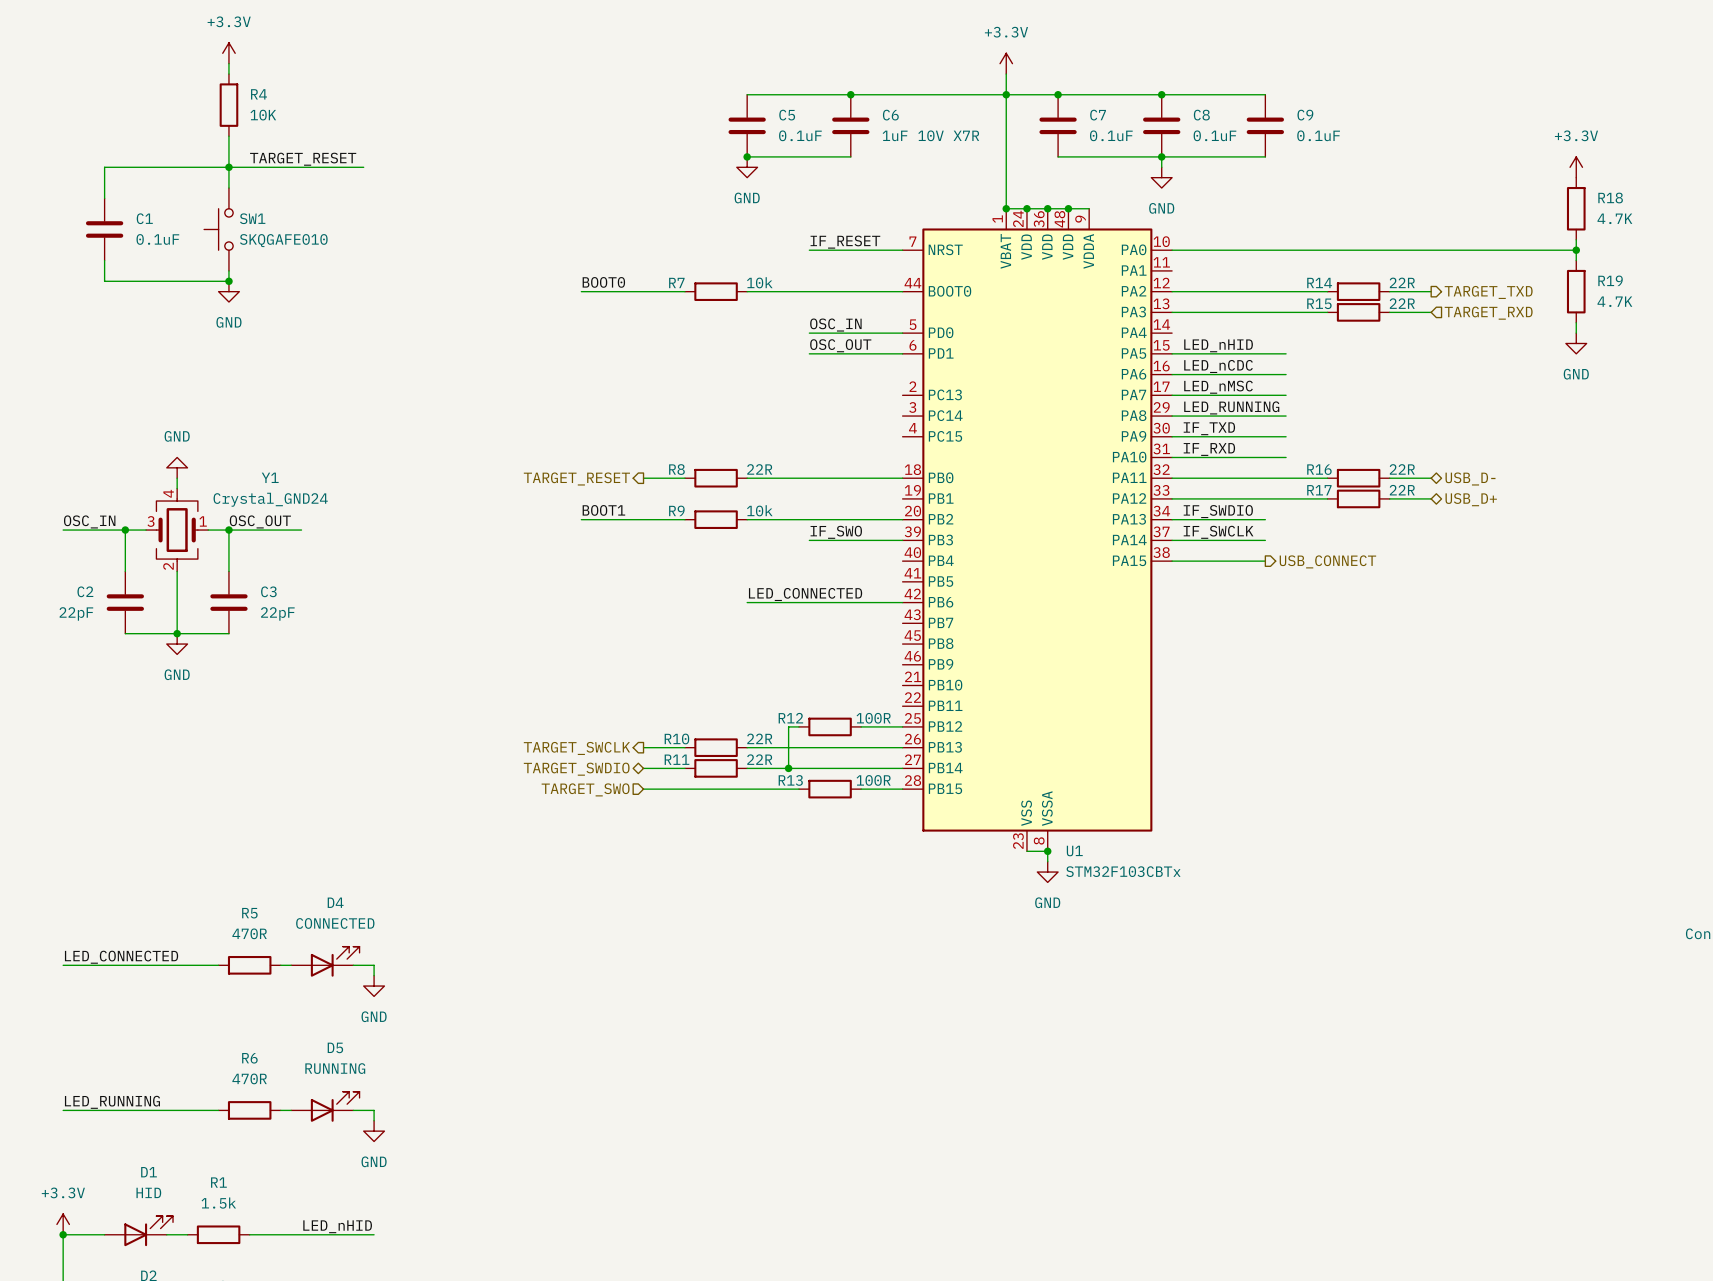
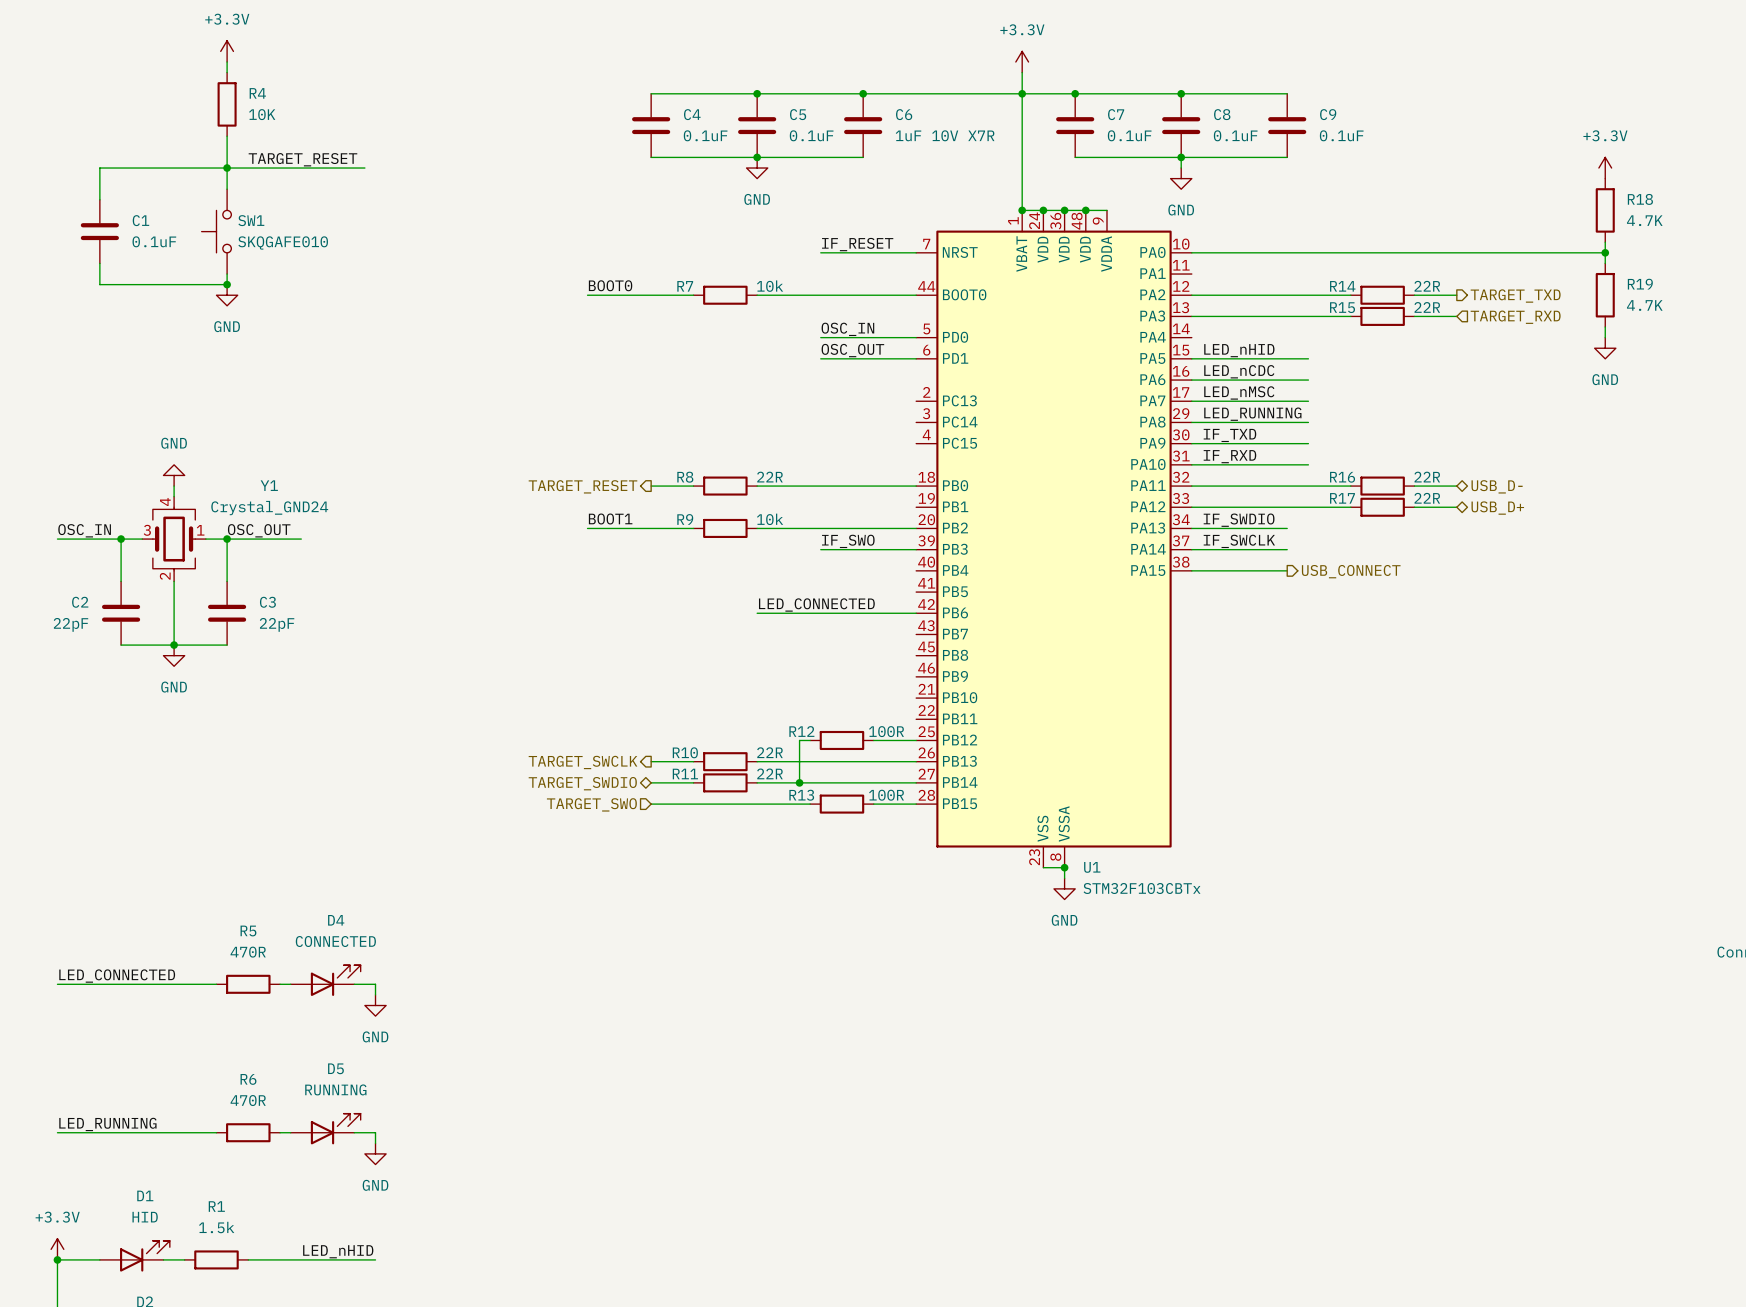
wire: none -> (651, 93) (757, 93)
junction: none -> (757, 93)
C4: none -> 0.1uF (651, 125)
wire: none -> (651, 157) (757, 157)

